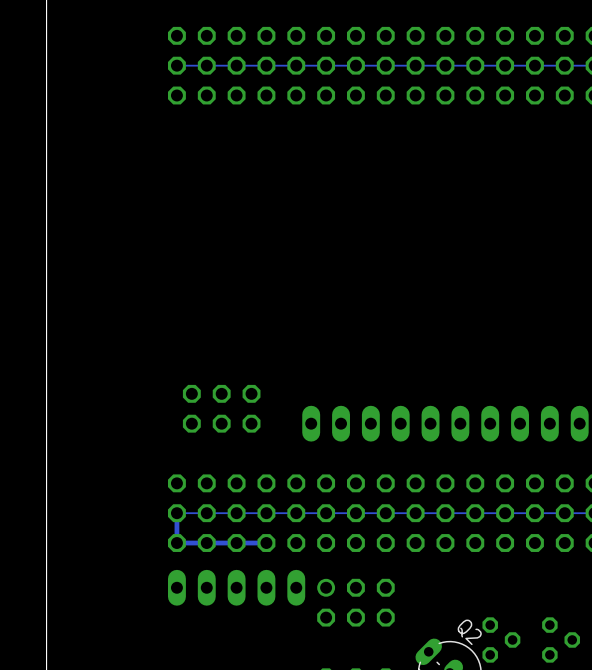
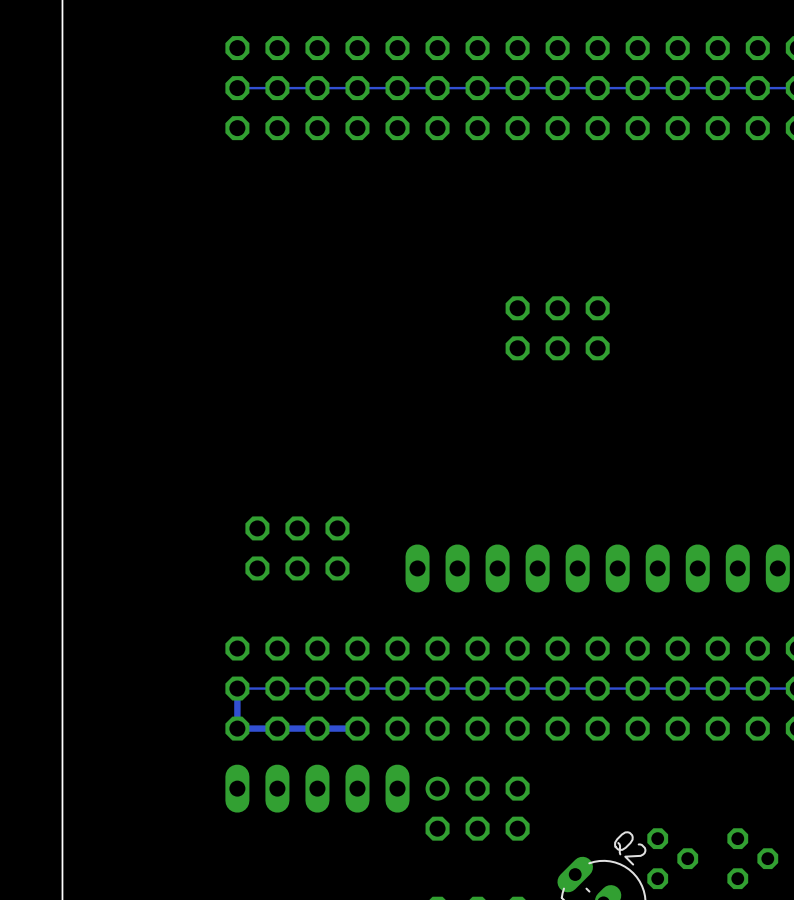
part: none -> (557, 328)

